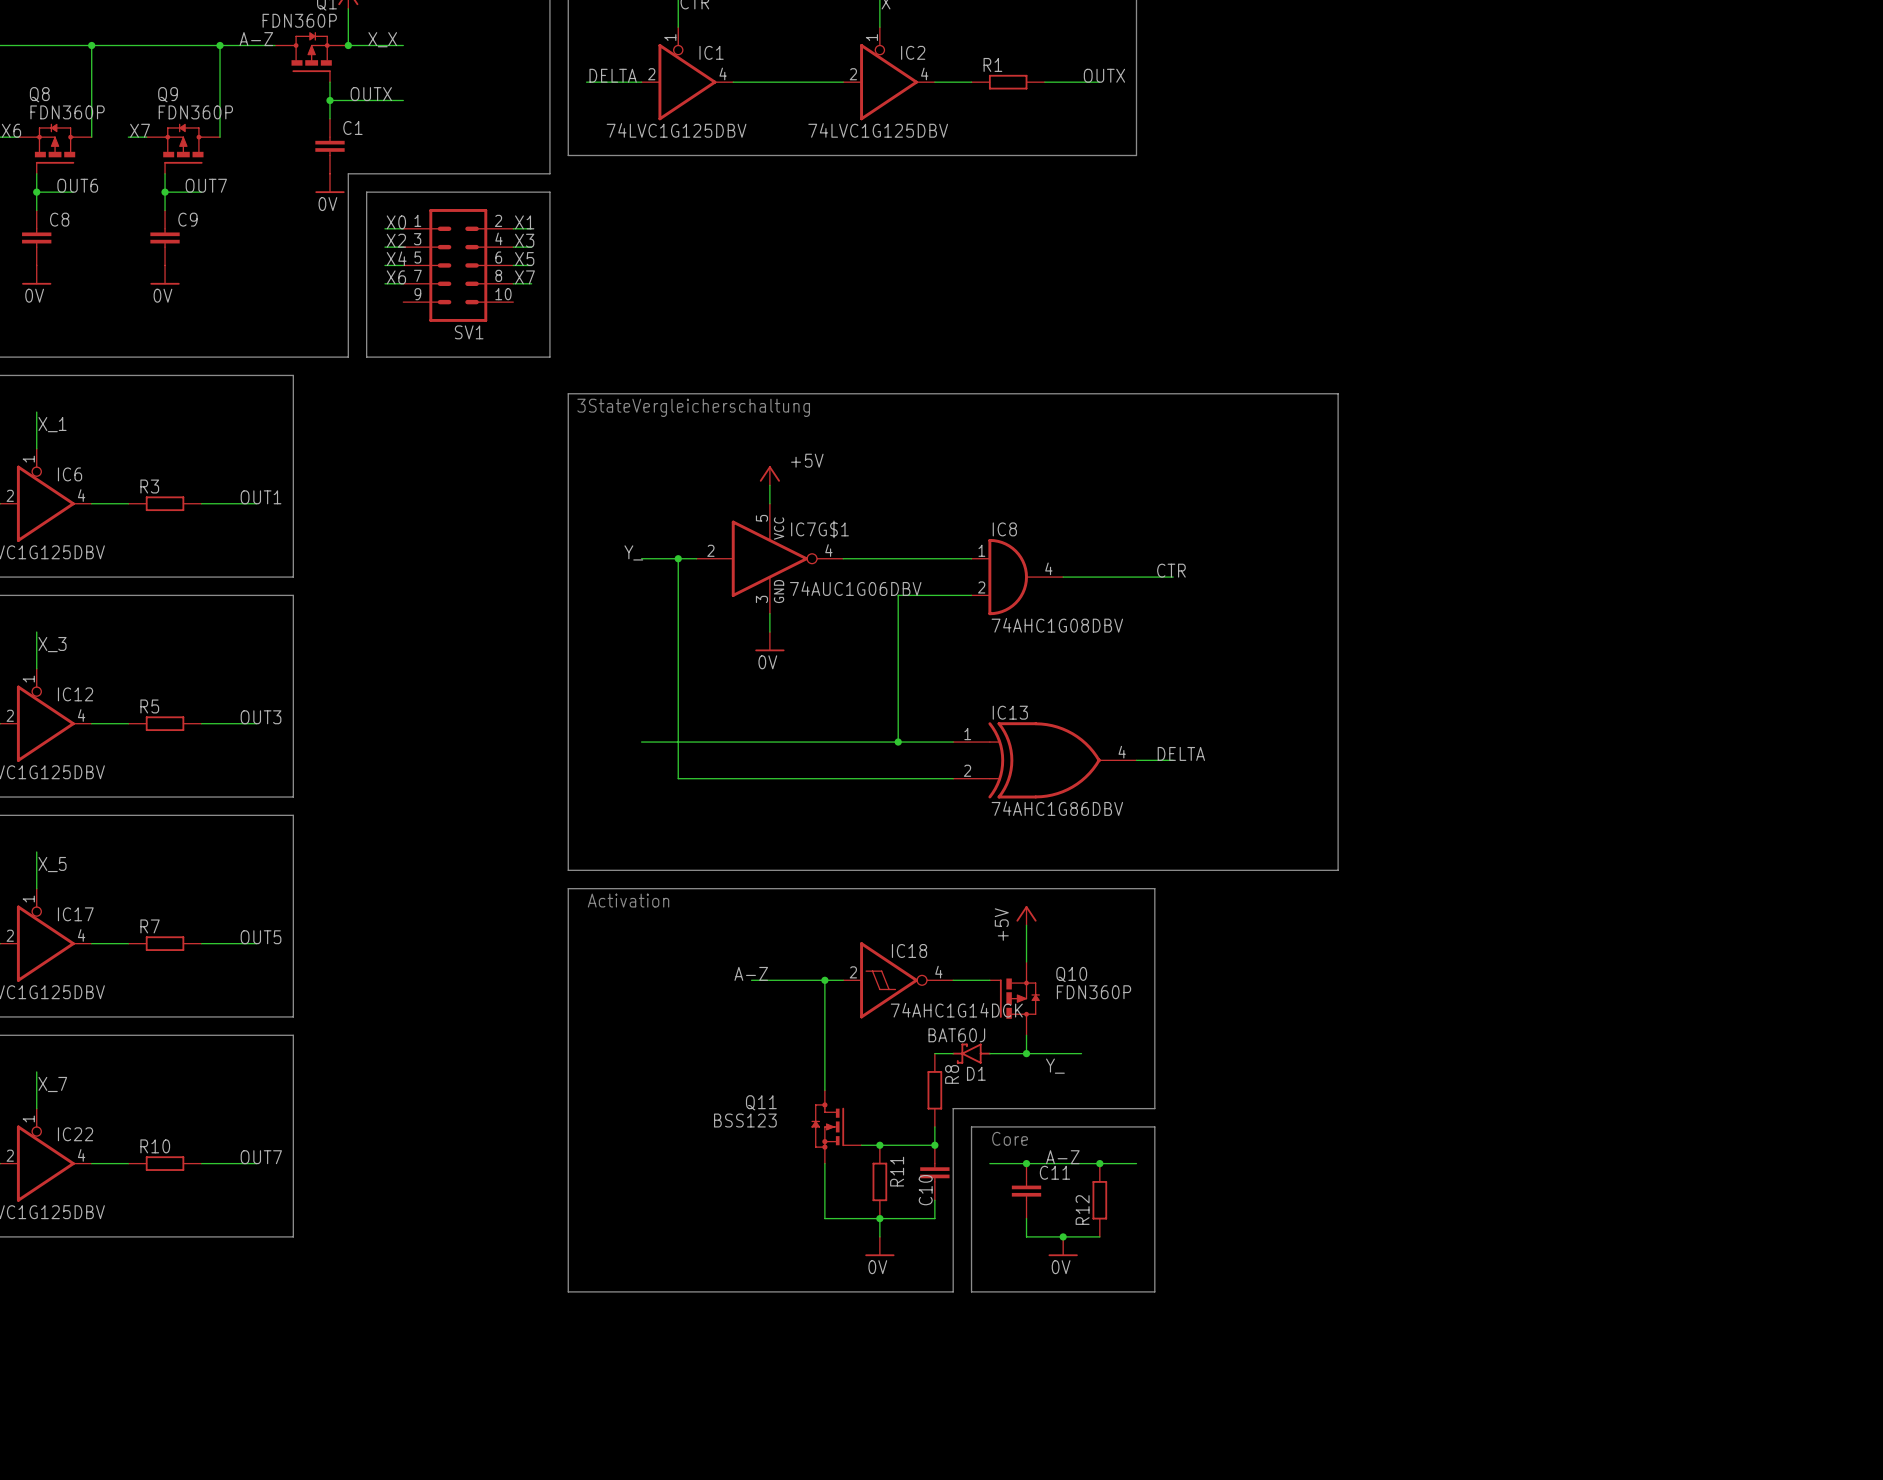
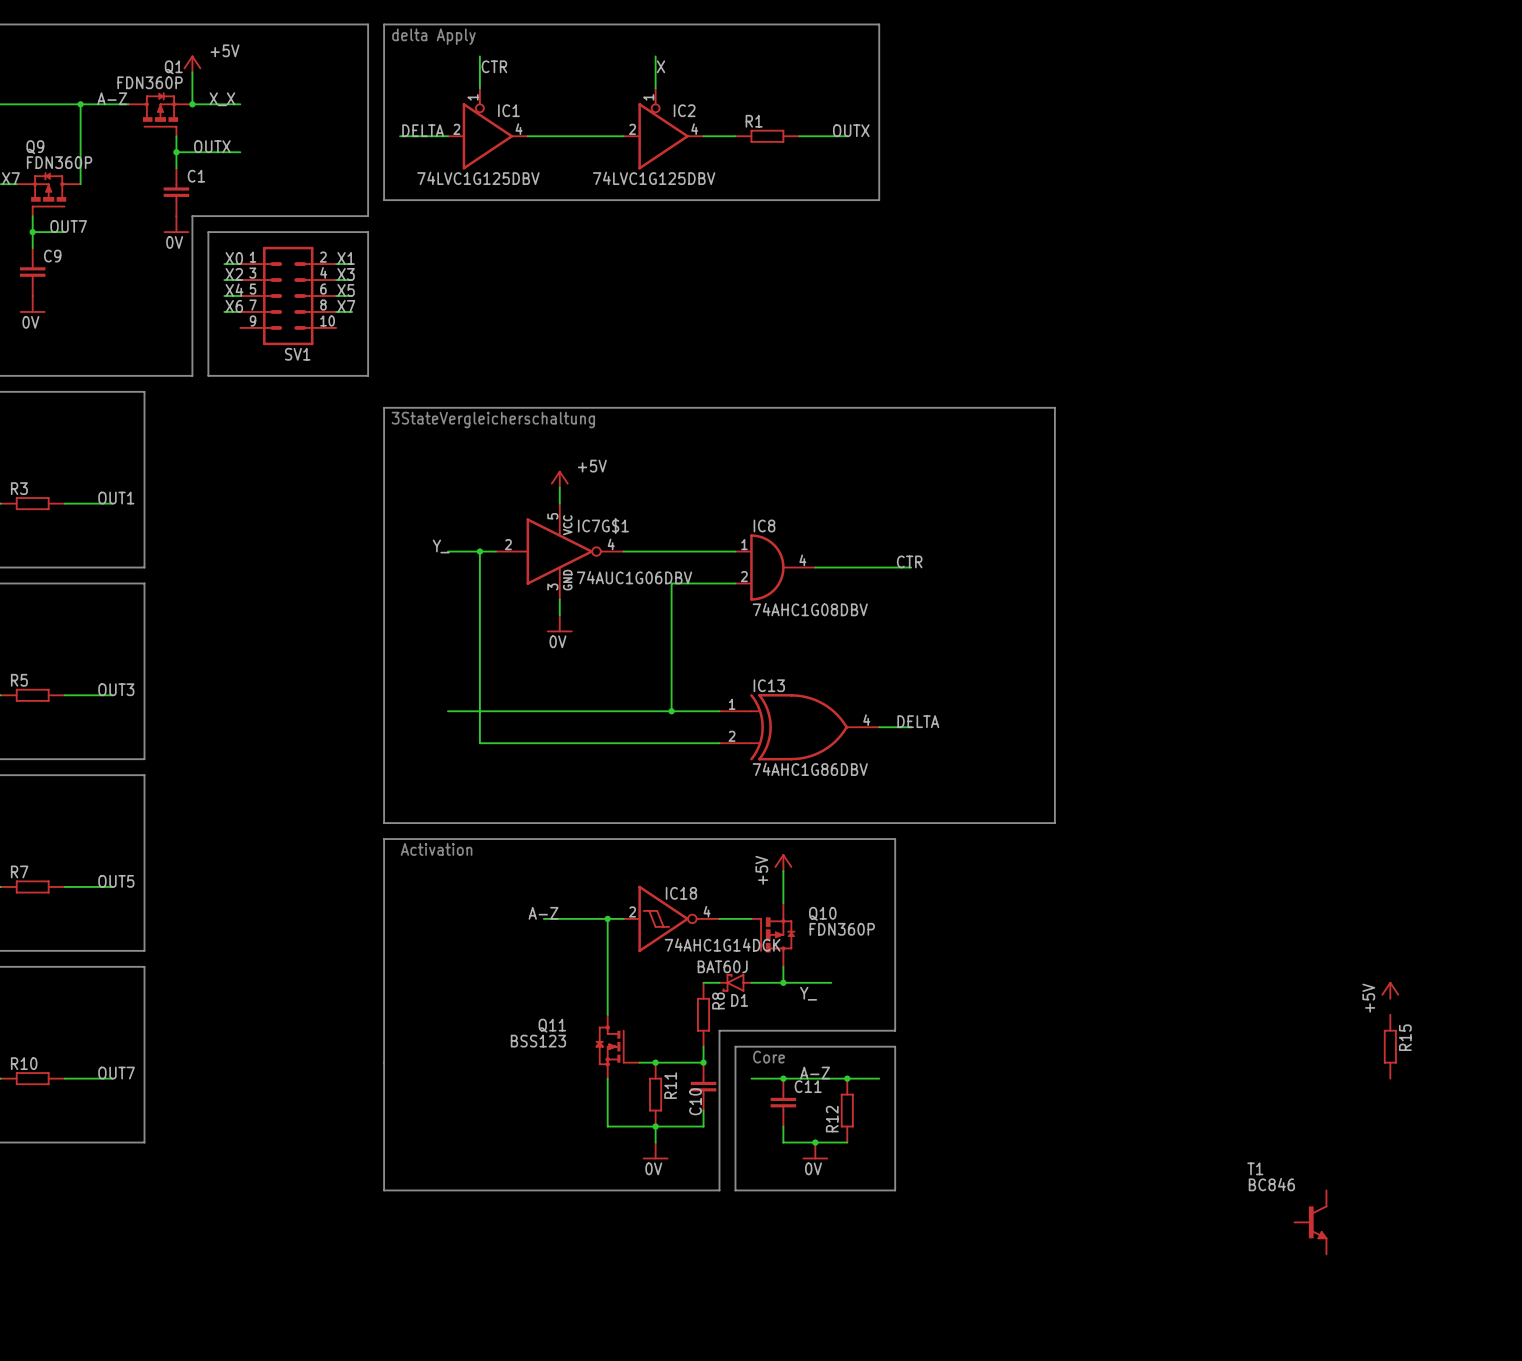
power symbol: none -> +5V (1390, 990)
R15: none -> (1390, 1046)
T1: none -> BC846 (1310, 1222)

